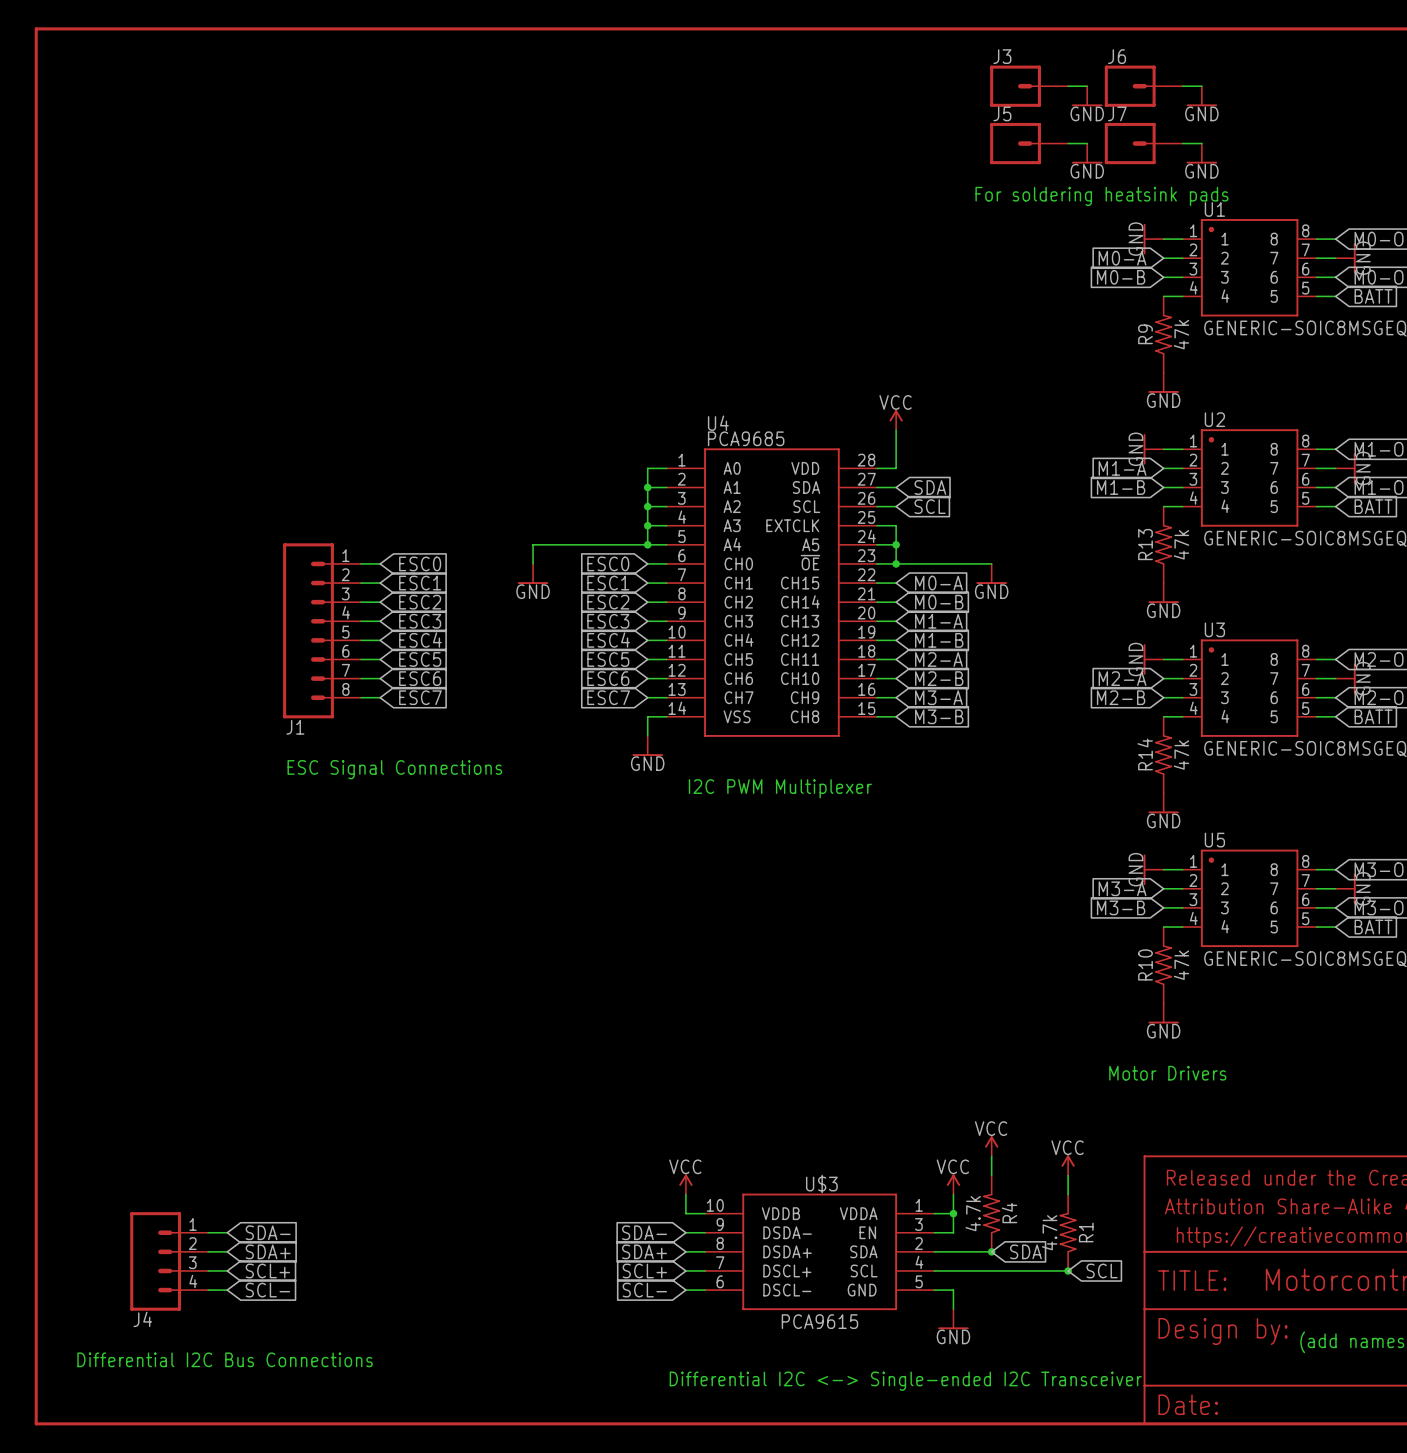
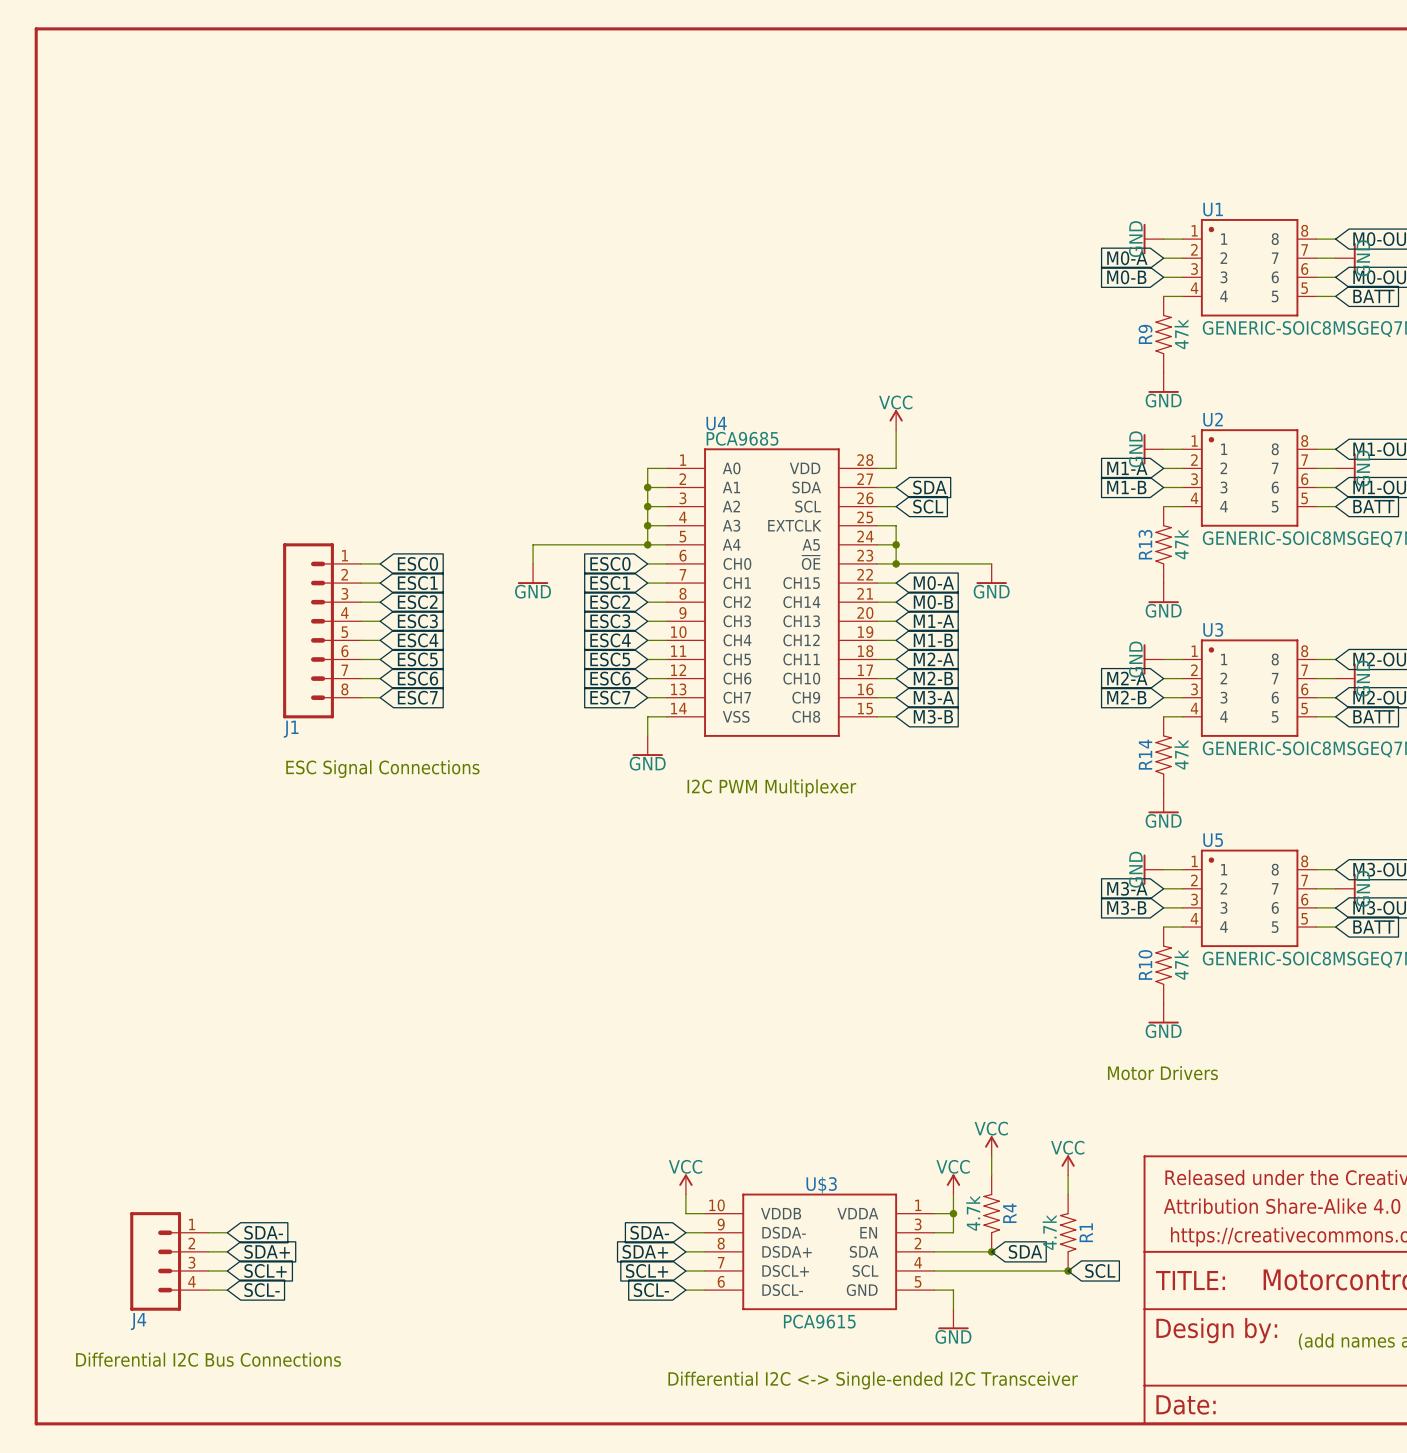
J3: (1029, 86) -> none
wire: (1068, 86) (1087, 86) -> none
J6: (1143, 86) -> none
wire: (1182, 86) (1201, 86) -> none
power symbol: GND (1087, 96) -> none
power symbol: GND (1201, 96) -> none
J5: (1029, 143) -> none
wire: (1068, 143) (1087, 143) -> none
J7: (1143, 143) -> none
wire: (1182, 143) (1201, 143) -> none
power symbol: GND (1087, 153) -> none
power symbol: GND (1201, 153) -> none
text: For soldering heatsink pads (1101, 196) -> none

